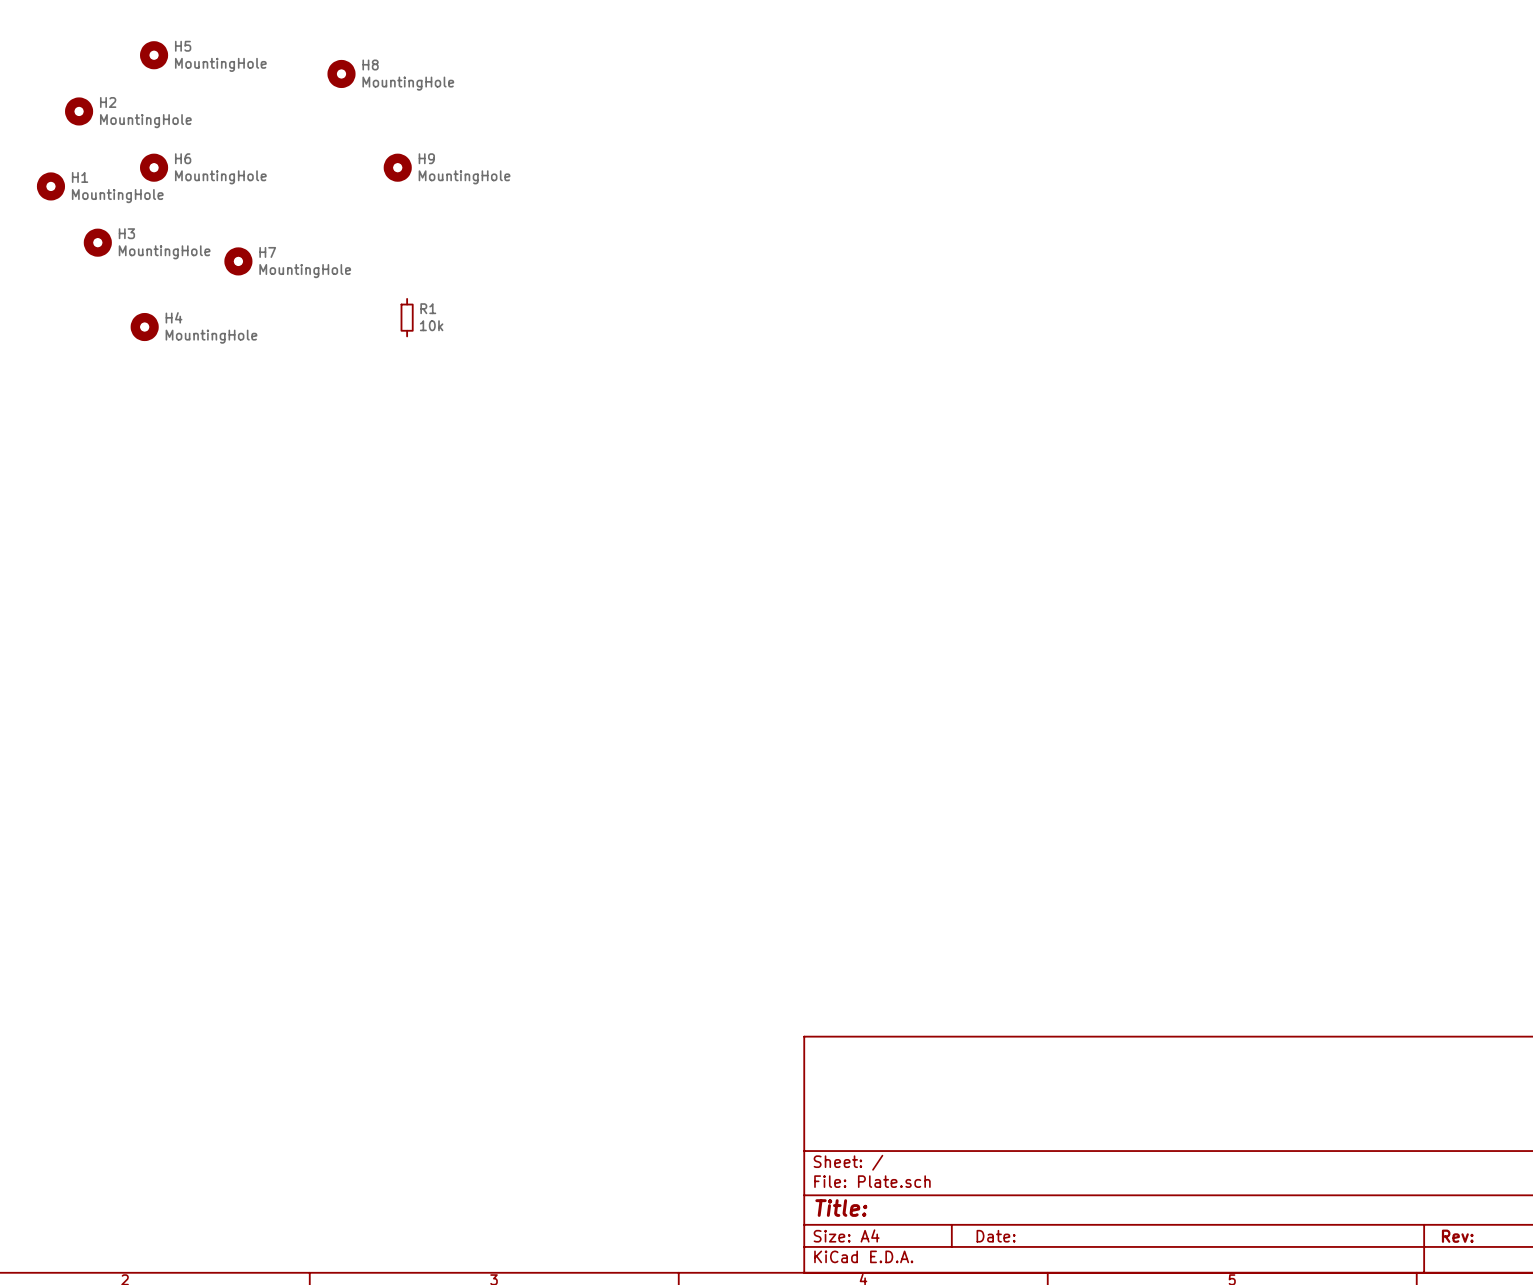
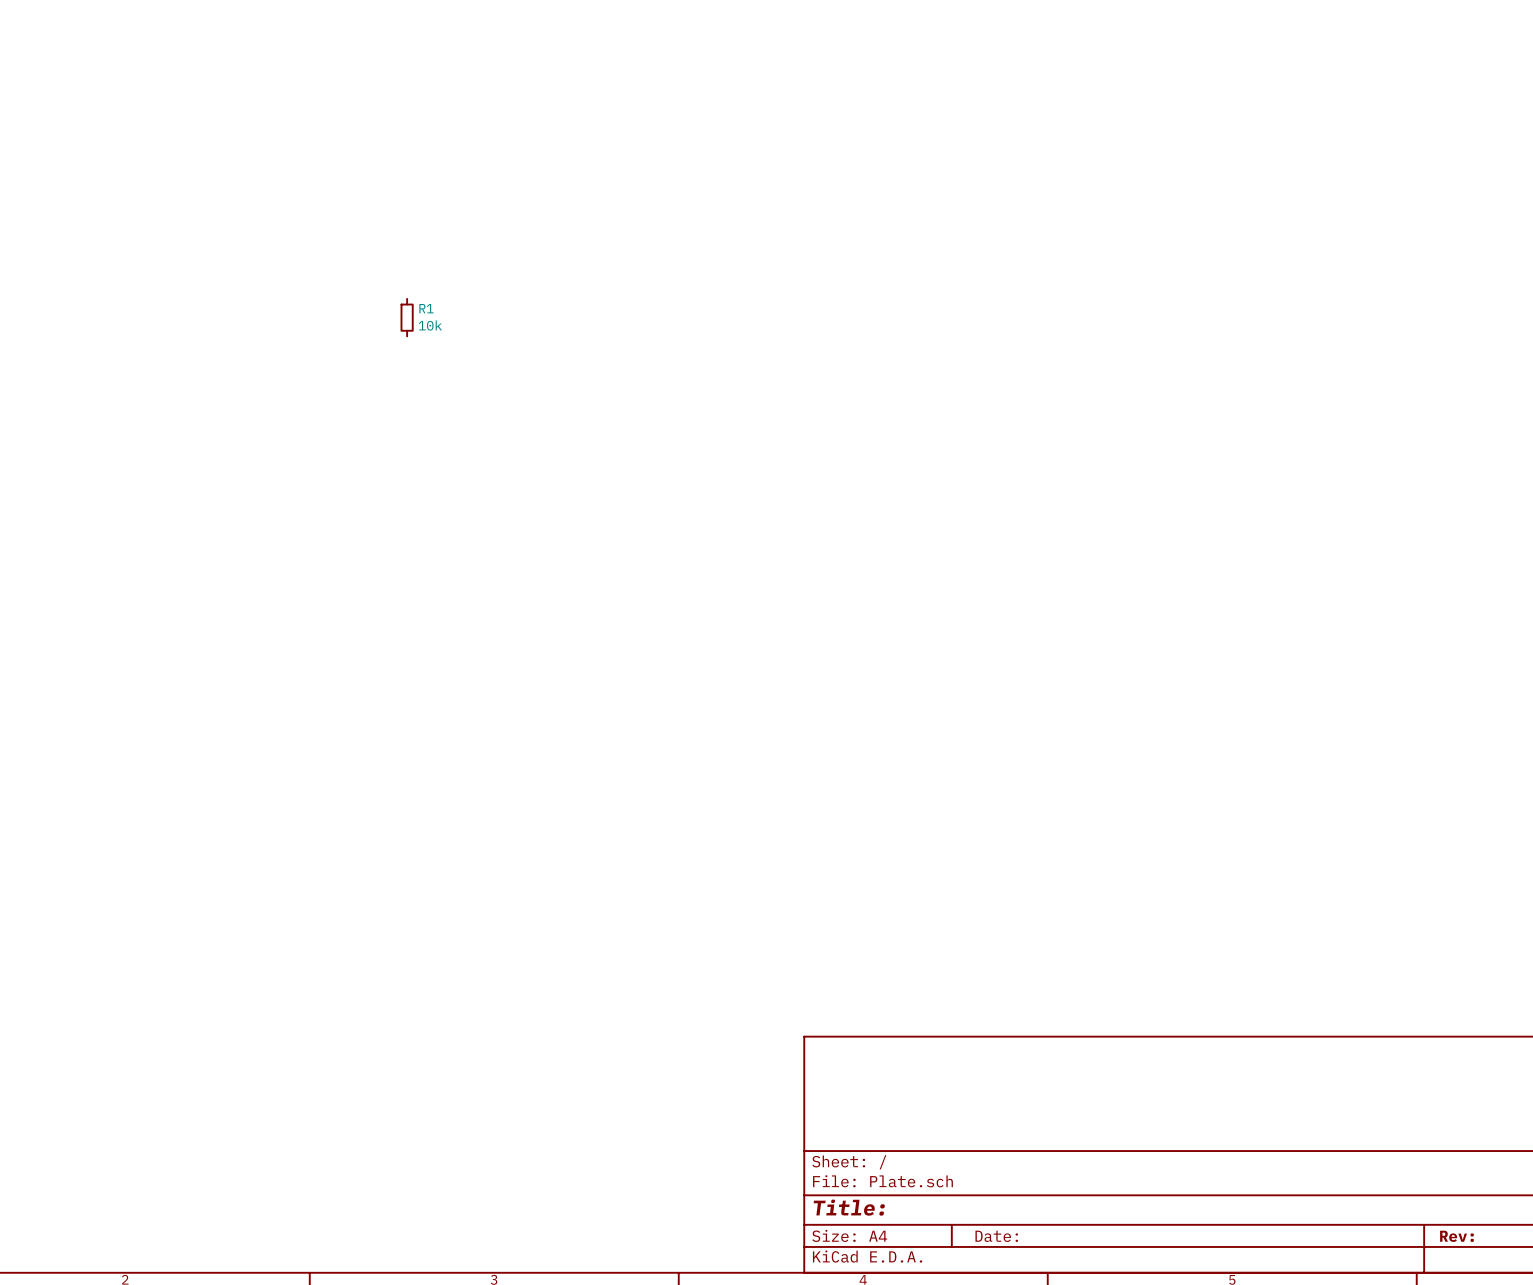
H5: MountingHole (154, 55) -> none
H8: MountingHole (341, 73) -> none
H2: MountingHole (79, 111) -> none
H6: MountingHole (154, 167) -> none
H9: MountingHole (397, 167) -> none
H1: MountingHole (50, 186) -> none
H3: MountingHole (97, 242) -> none
H7: MountingHole (238, 261) -> none
H4: MountingHole (144, 327) -> none

